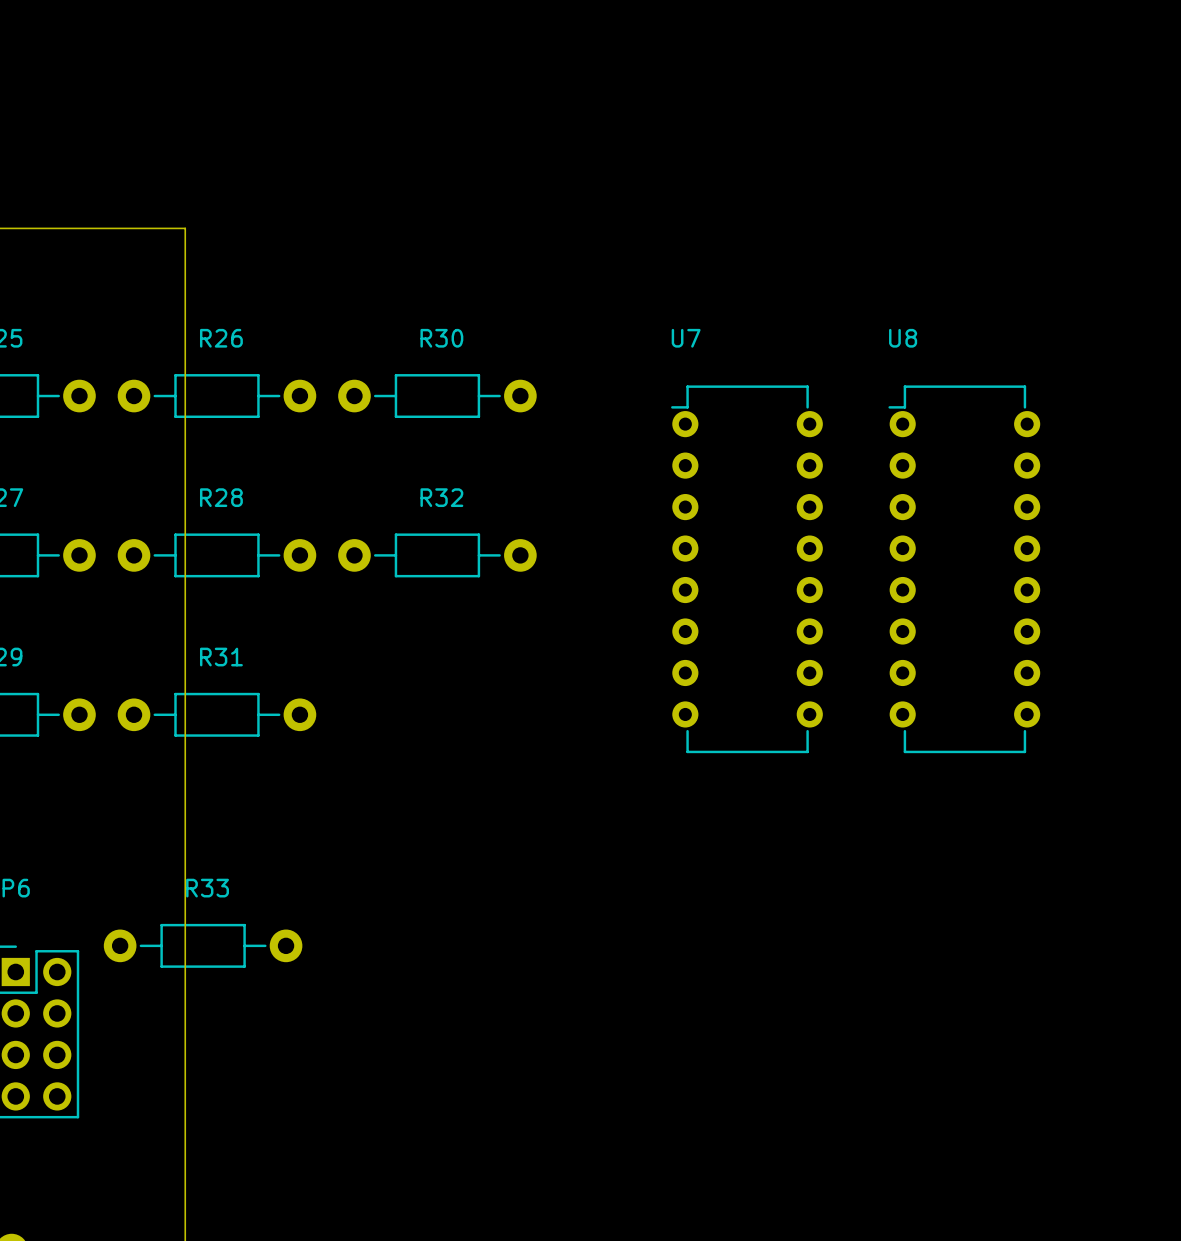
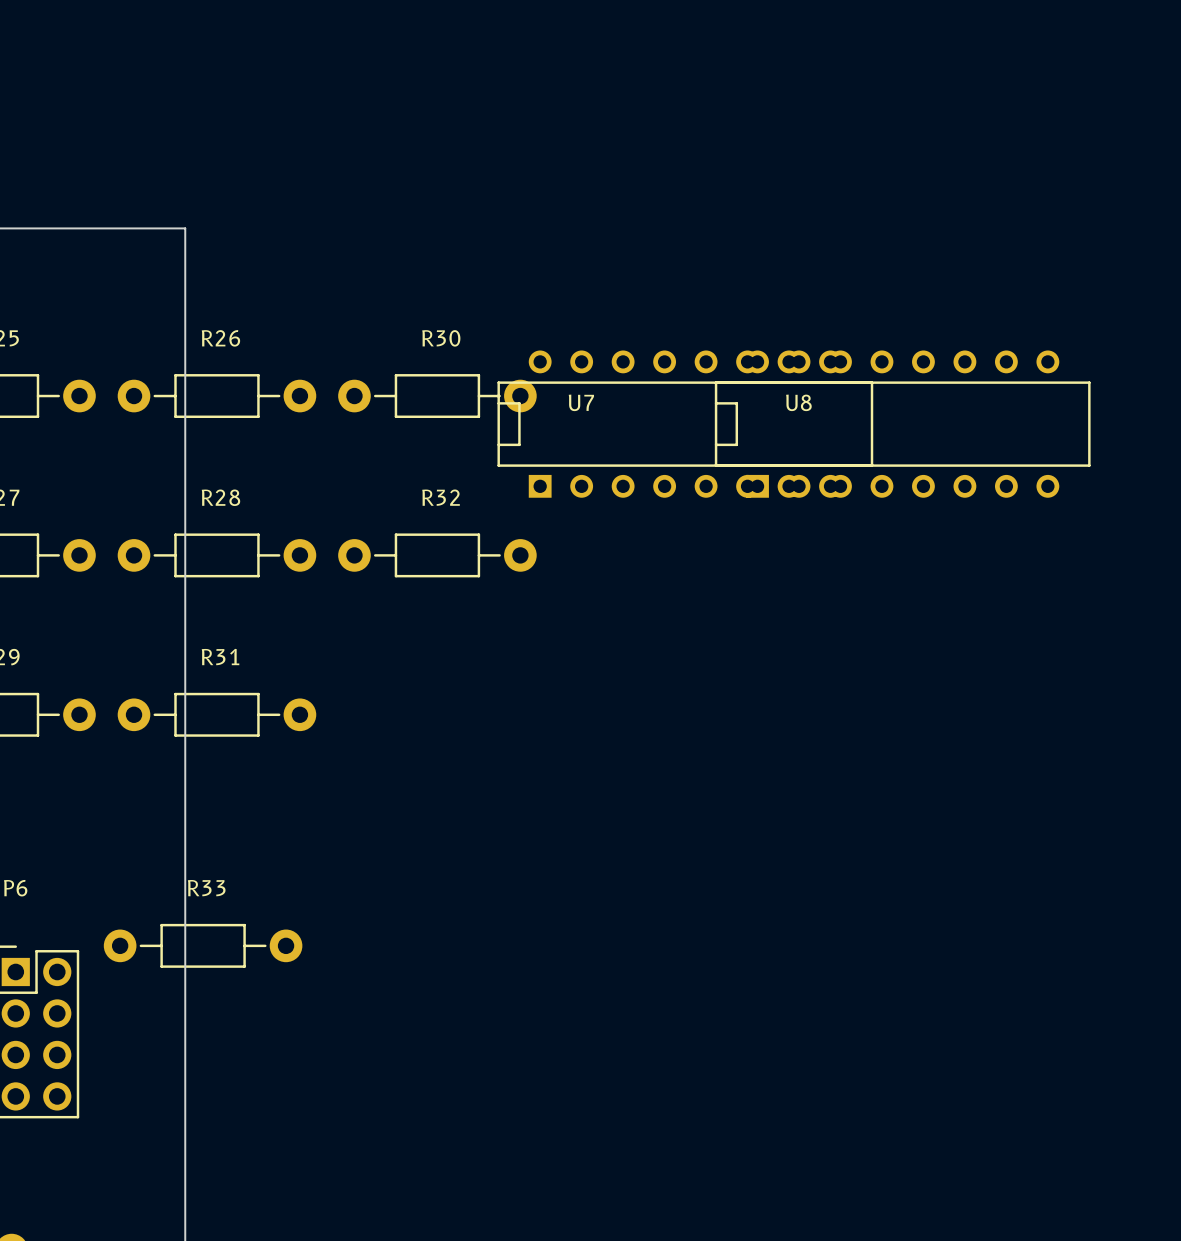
U7 name position: U7 (686, 338) -> U7 (581, 402)
U8 name position: U8 (903, 338) -> U8 (798, 402)
U7 footprint: [671, 385, 823, 754] -> [497, 350, 874, 498]
U8 footprint: [888, 385, 1041, 754] -> [714, 350, 1091, 498]

